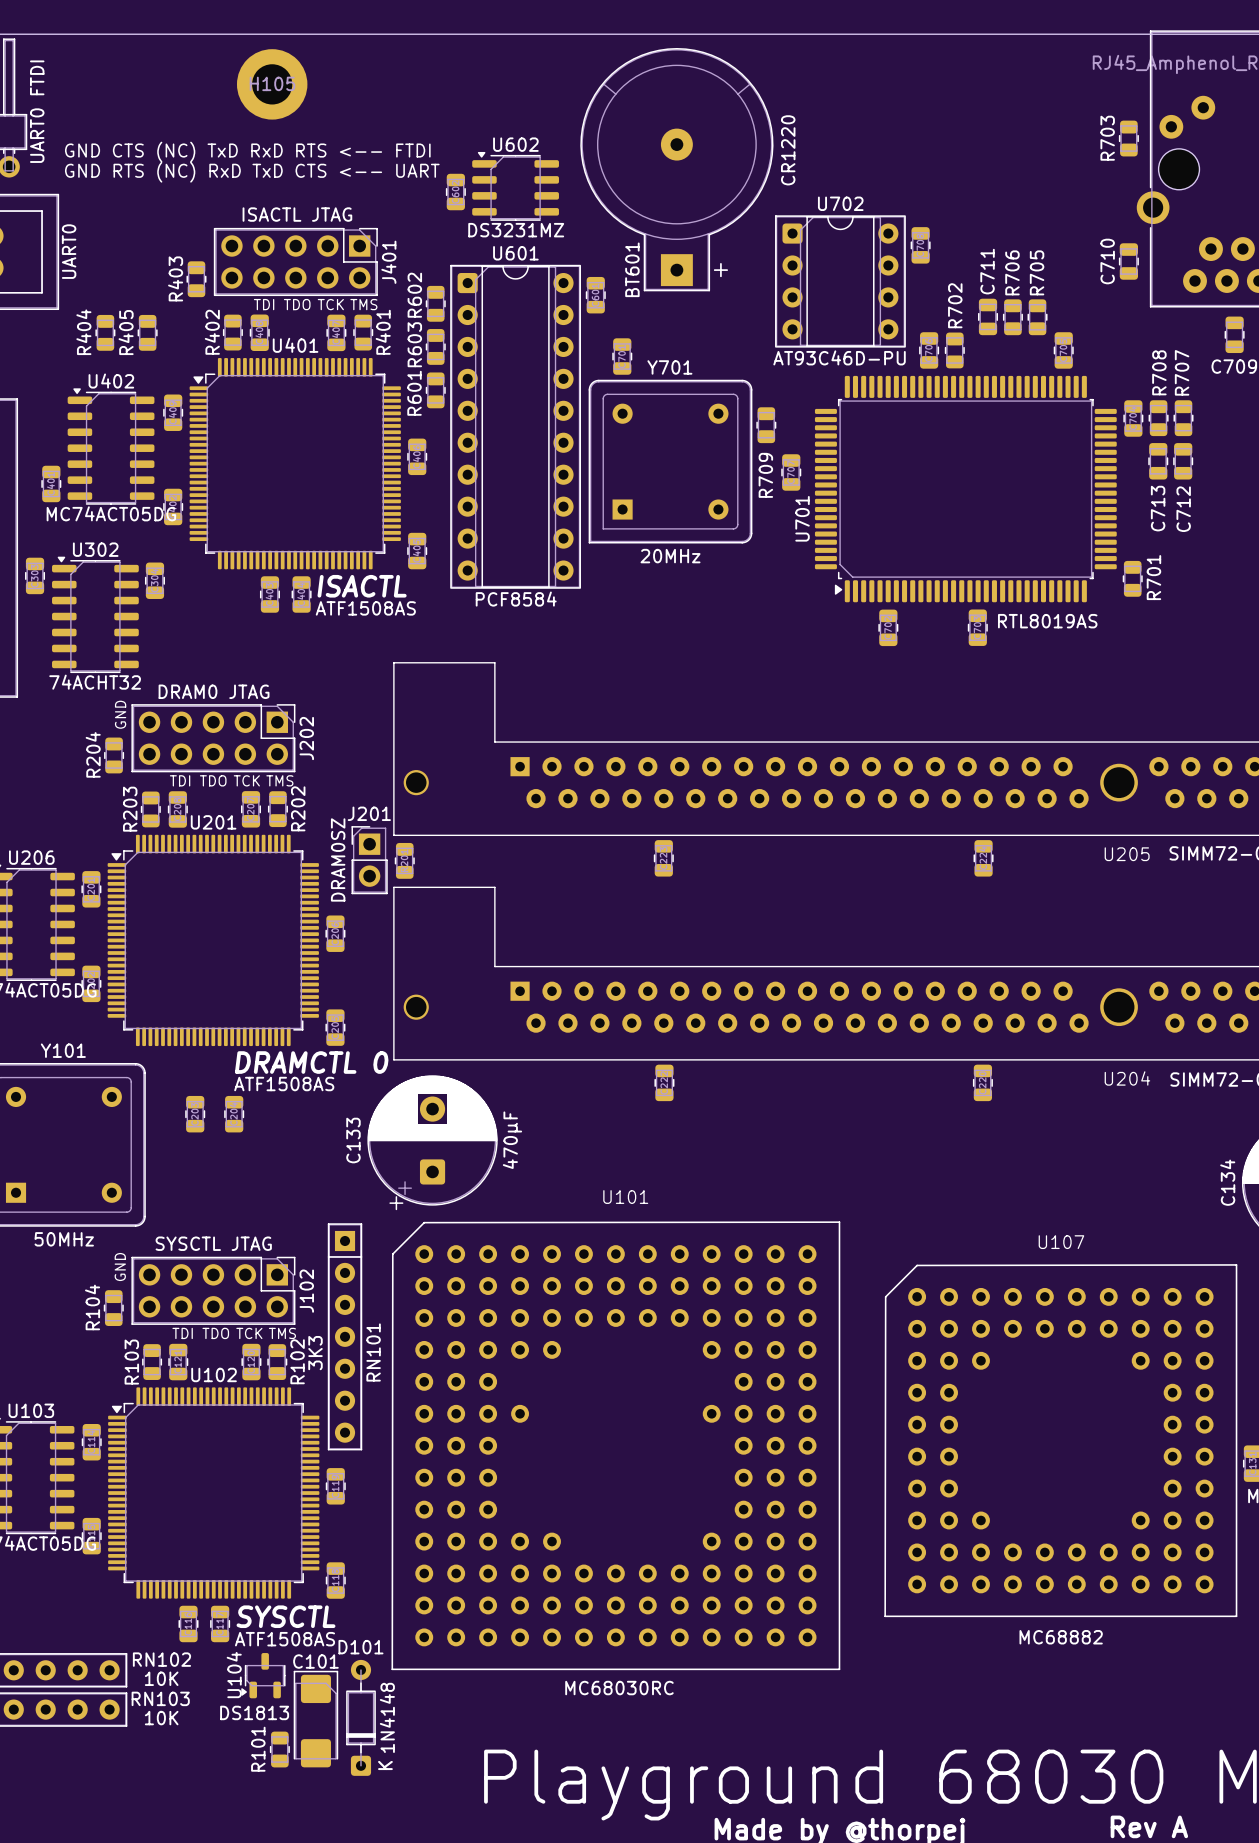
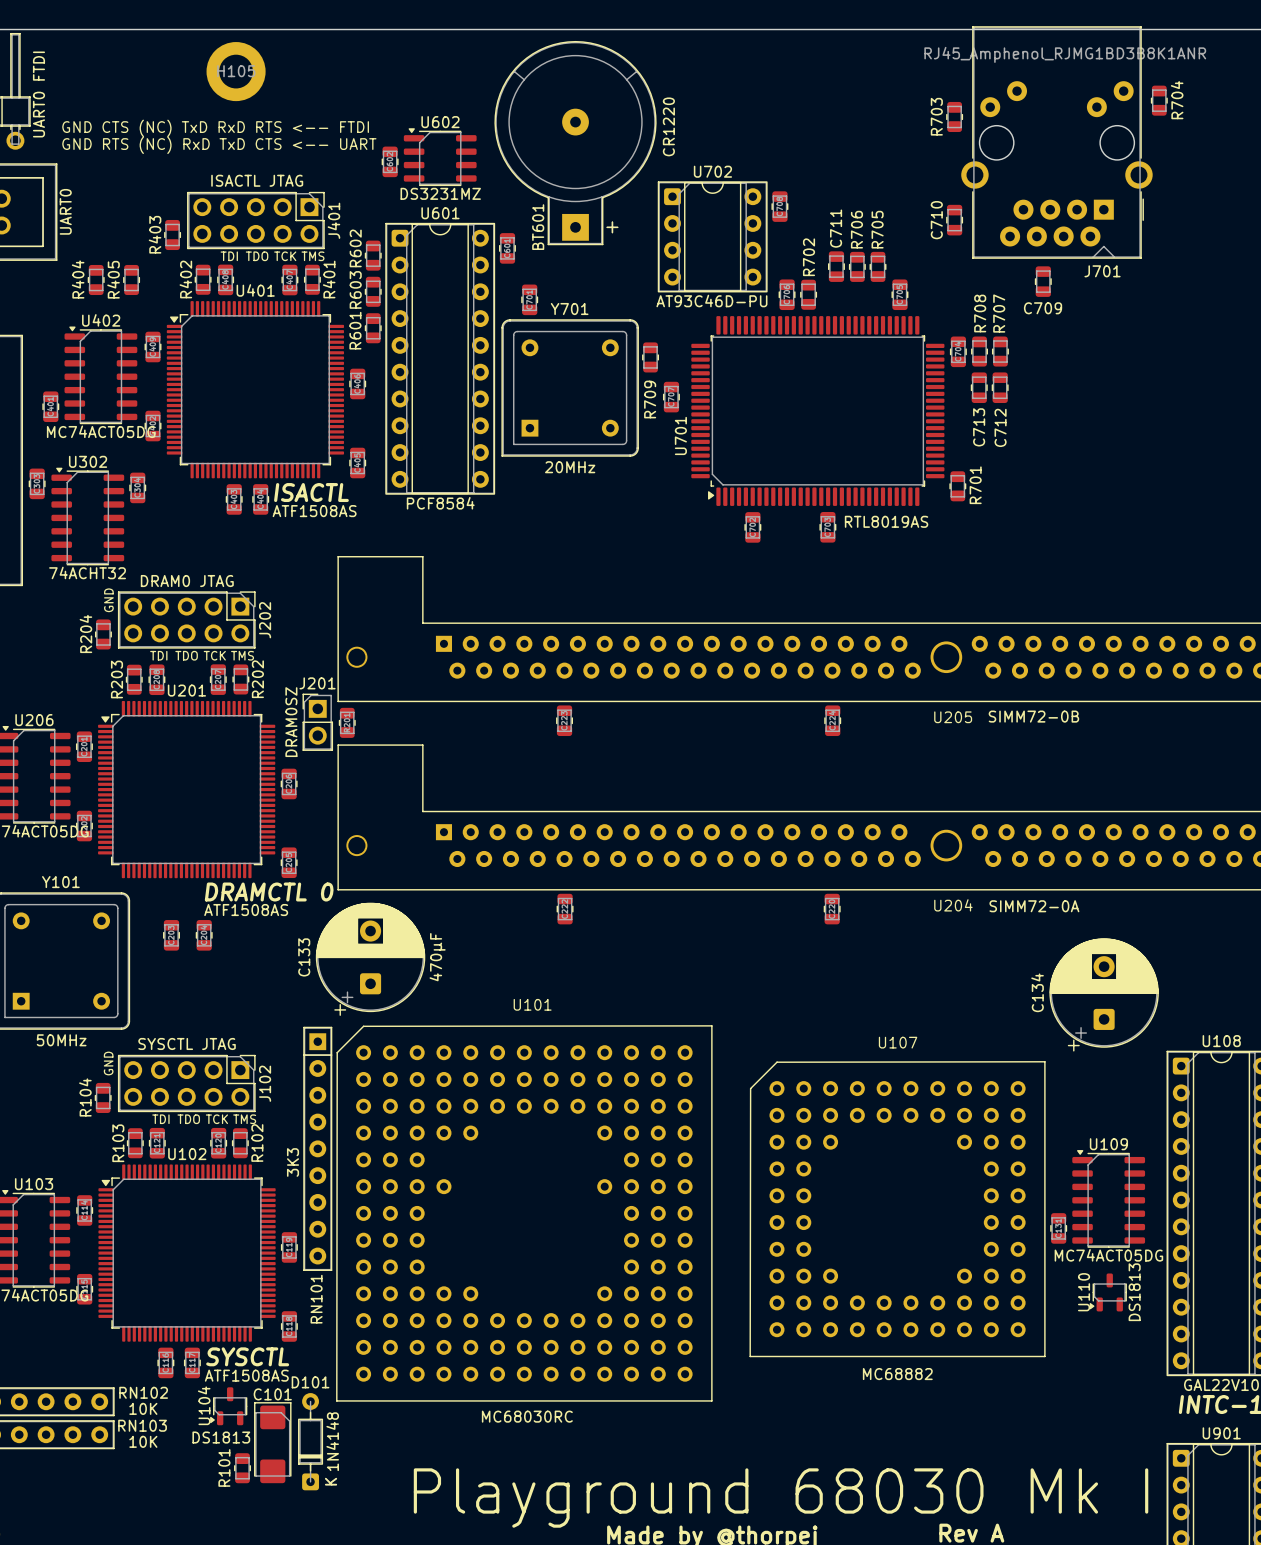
RN101 footprint: [327, 1223, 363, 1451] -> [303, 1026, 333, 1271]
RN101 name position: RN101 (373, 1352) -> RN101 (316, 1299)

